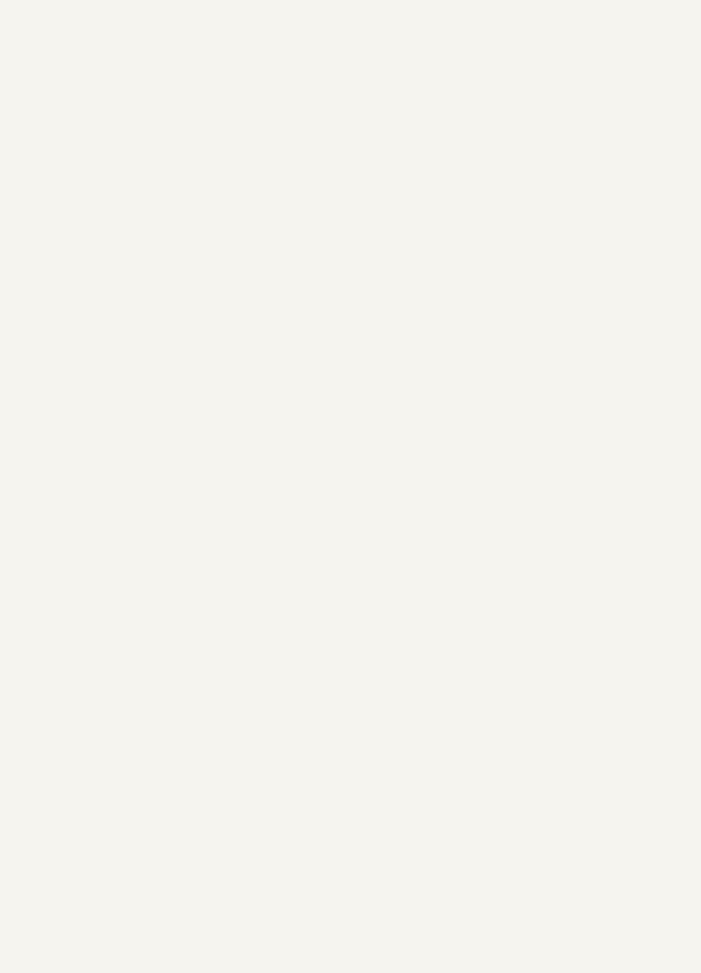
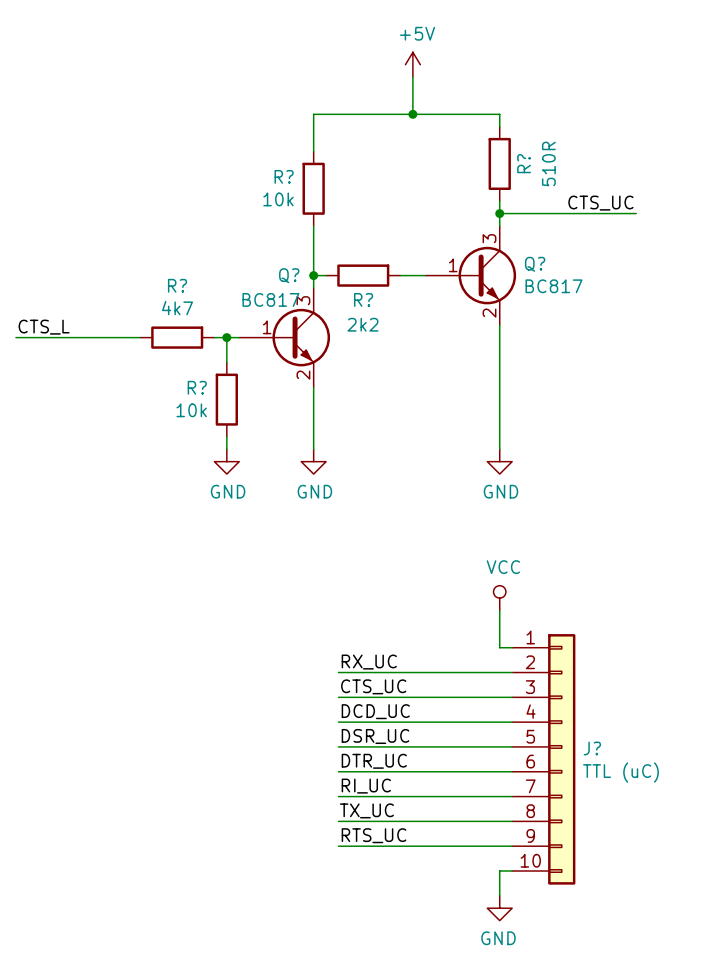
power symbol: none -> +5V (412, 64)
wire: none -> (412, 77) (412, 114)
junction: none -> (412, 114)
wire: none -> (499, 126) (499, 114) (313, 114) (313, 151)
R?: none -> 510R (499, 163)
R?: none -> 10k (313, 188)
wire: none -> (499, 201) (499, 225)
label: none -> CTS_UC (600, 203)
wire: none -> (499, 213) (636, 213)
junction: none -> (499, 213)
wire: none -> (313, 225) (313, 287)
wire: none -> (313, 275) (326, 275)
junction: none -> (313, 275)
R?: none -> 2k2 (363, 275)
wire: none -> (400, 275) (425, 275)
Q?: none -> BC817 (470, 275)
wire: none -> (499, 325) (499, 449)
label: none -> CTS_L (44, 327)
wire: none -> (15, 337) (140, 337)
R?: none -> 4k7 (177, 337)
wire: none -> (214, 337) (239, 337)
wire: none -> (226, 337) (226, 362)
junction: none -> (226, 337)
Q?: none -> BC817 (284, 337)
wire: none -> (313, 387) (313, 449)
R?: none -> 10k (226, 399)
wire: none -> (226, 436) (226, 449)
power symbol: none -> GND (226, 461)
power symbol: none -> GND (313, 461)
power symbol: none -> GND (499, 461)
power symbol: none -> VCC (499, 598)
wire: none -> (499, 610) (499, 647) (512, 647)
label: none -> RX_UC (369, 662)
wire: none -> (338, 672) (512, 672)
label: none -> CTS_UC (373, 686)
wire: none -> (338, 697) (512, 697)
label: none -> DCD_UC (375, 711)
wire: none -> (338, 722) (512, 722)
label: none -> DSR_UC (375, 736)
wire: none -> (338, 746) (512, 746)
J?: none -> TTL (uC) (543, 759)
label: none -> DTR_UC (374, 761)
wire: none -> (338, 771) (512, 771)
label: none -> RI_UC (366, 786)
wire: none -> (338, 796) (512, 796)
label: none -> TX_UC (366, 810)
wire: none -> (338, 821) (512, 821)
label: none -> RTS_UC (374, 835)
wire: none -> (338, 846) (512, 846)
wire: none -> (512, 871) (499, 871) (499, 895)
power symbol: none -> GND (499, 908)

